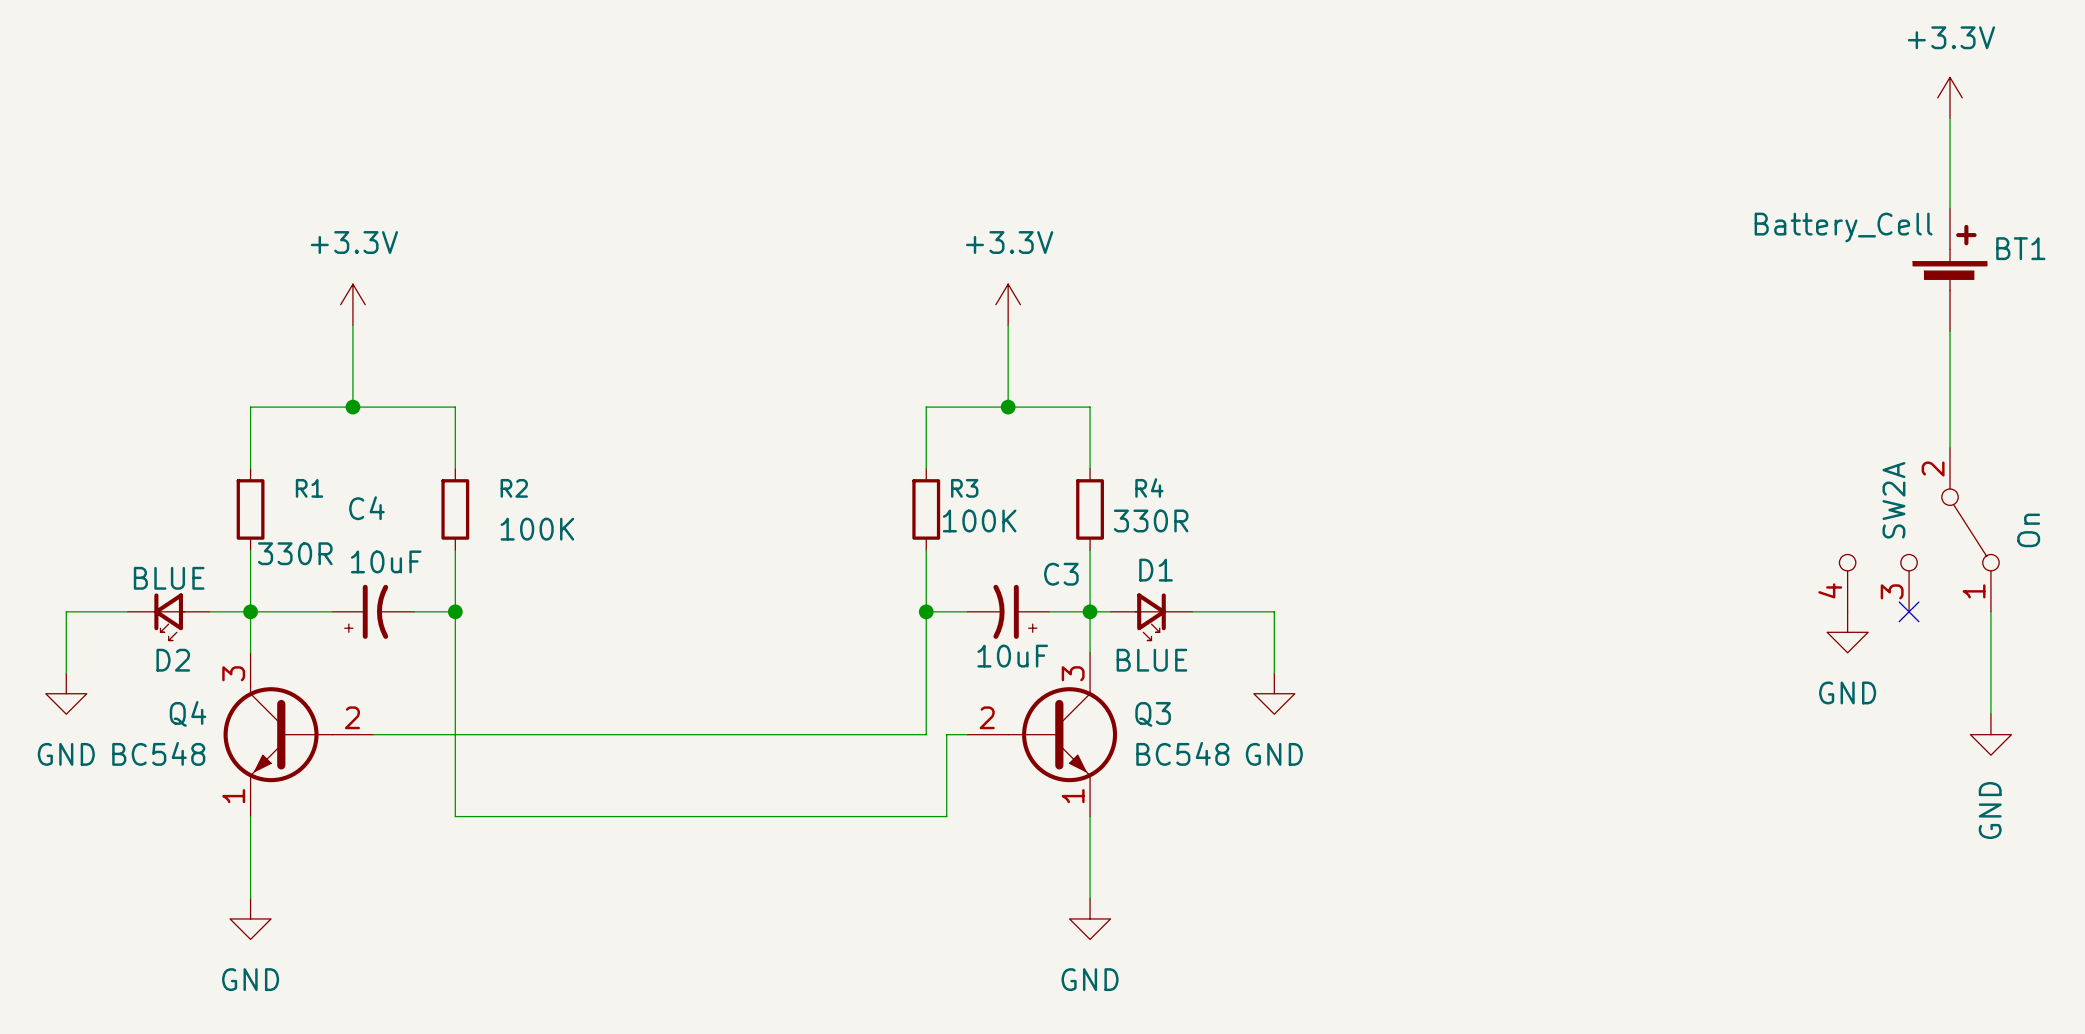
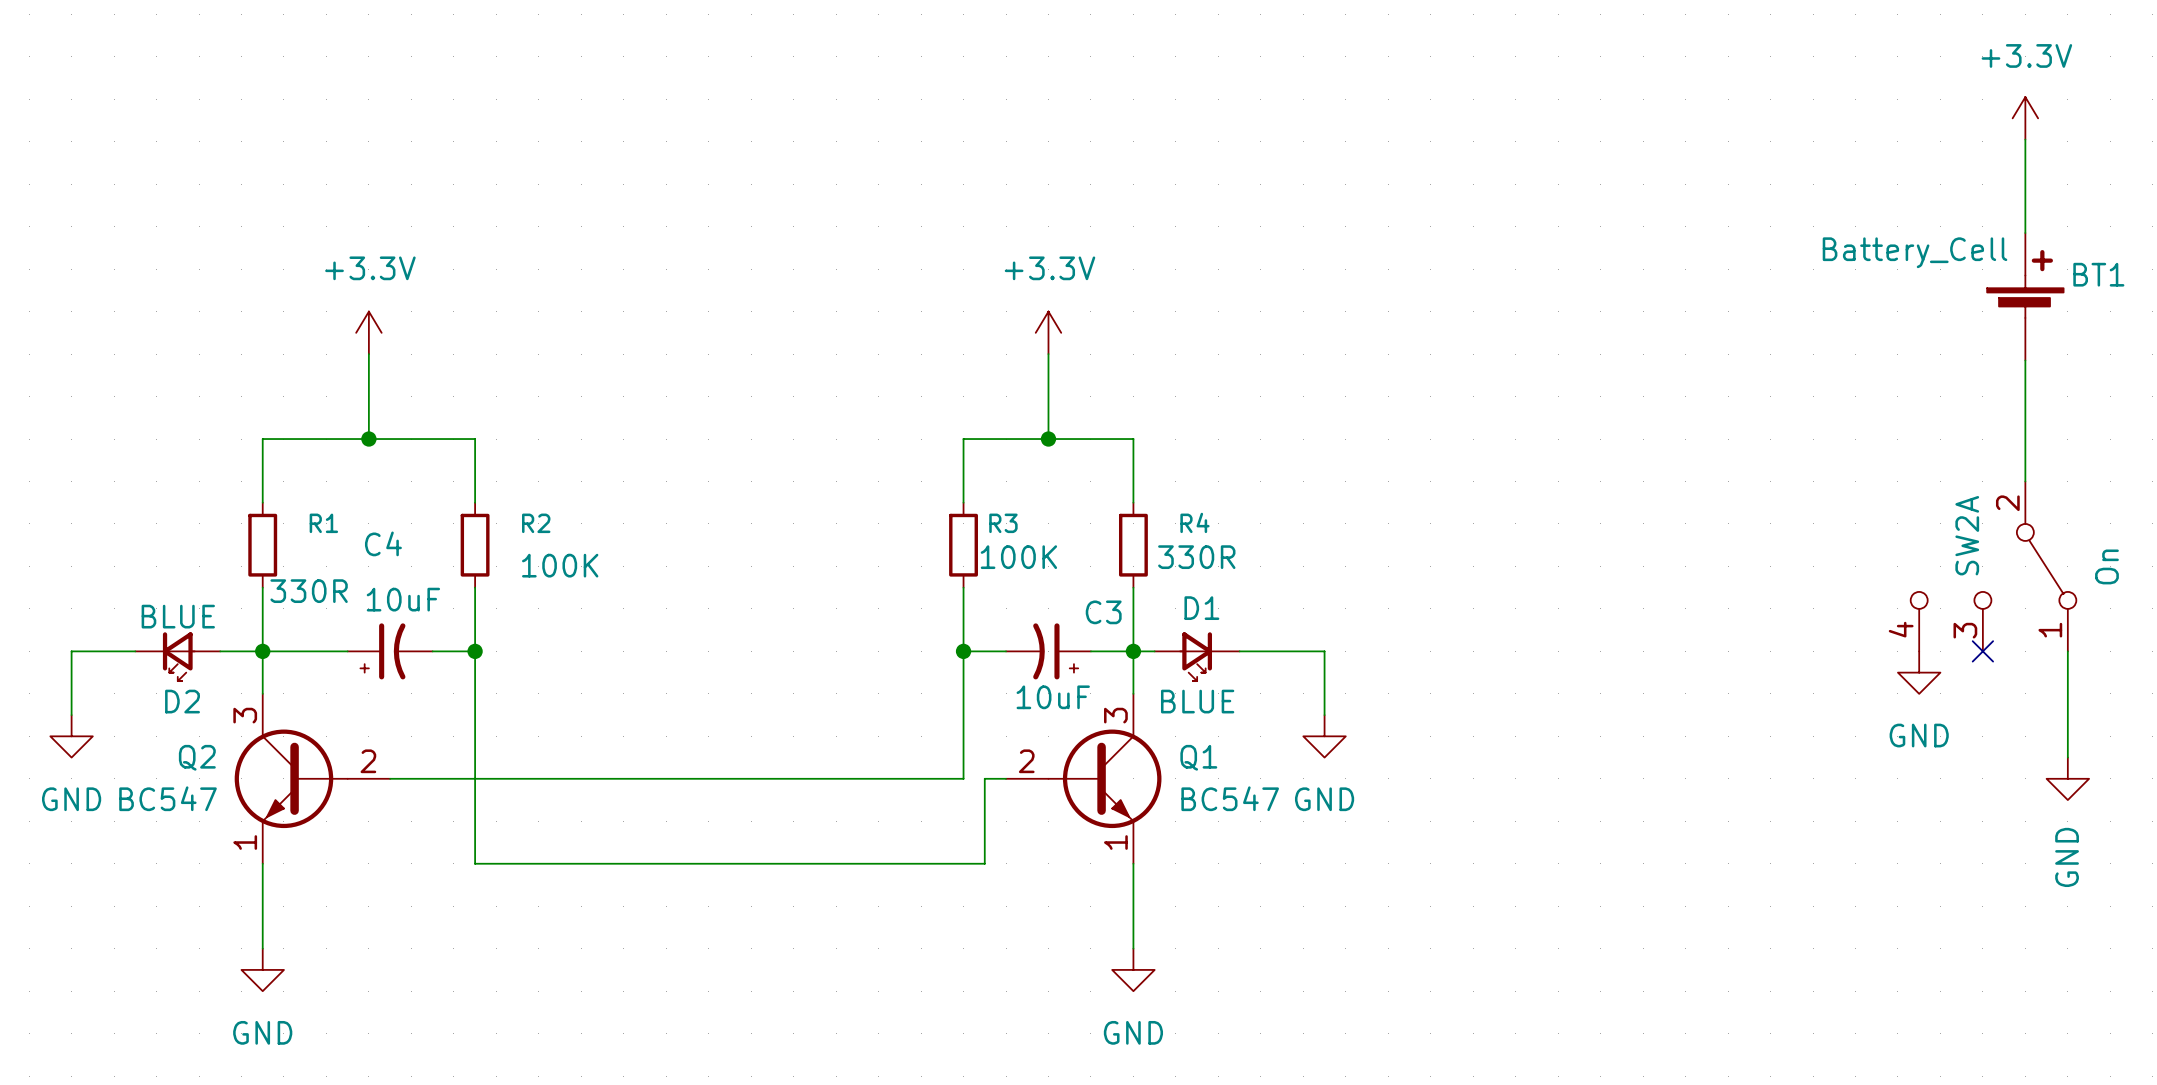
Q4 name: Q4 (188, 713) -> Q2 (197, 757)
Q3 name: Q3 (1153, 714) -> Q1 (1198, 757)
Q4 value: BC548 (158, 753) -> BC547 (168, 798)
Q3 value: BC548 (1182, 753) -> BC547 (1230, 798)

